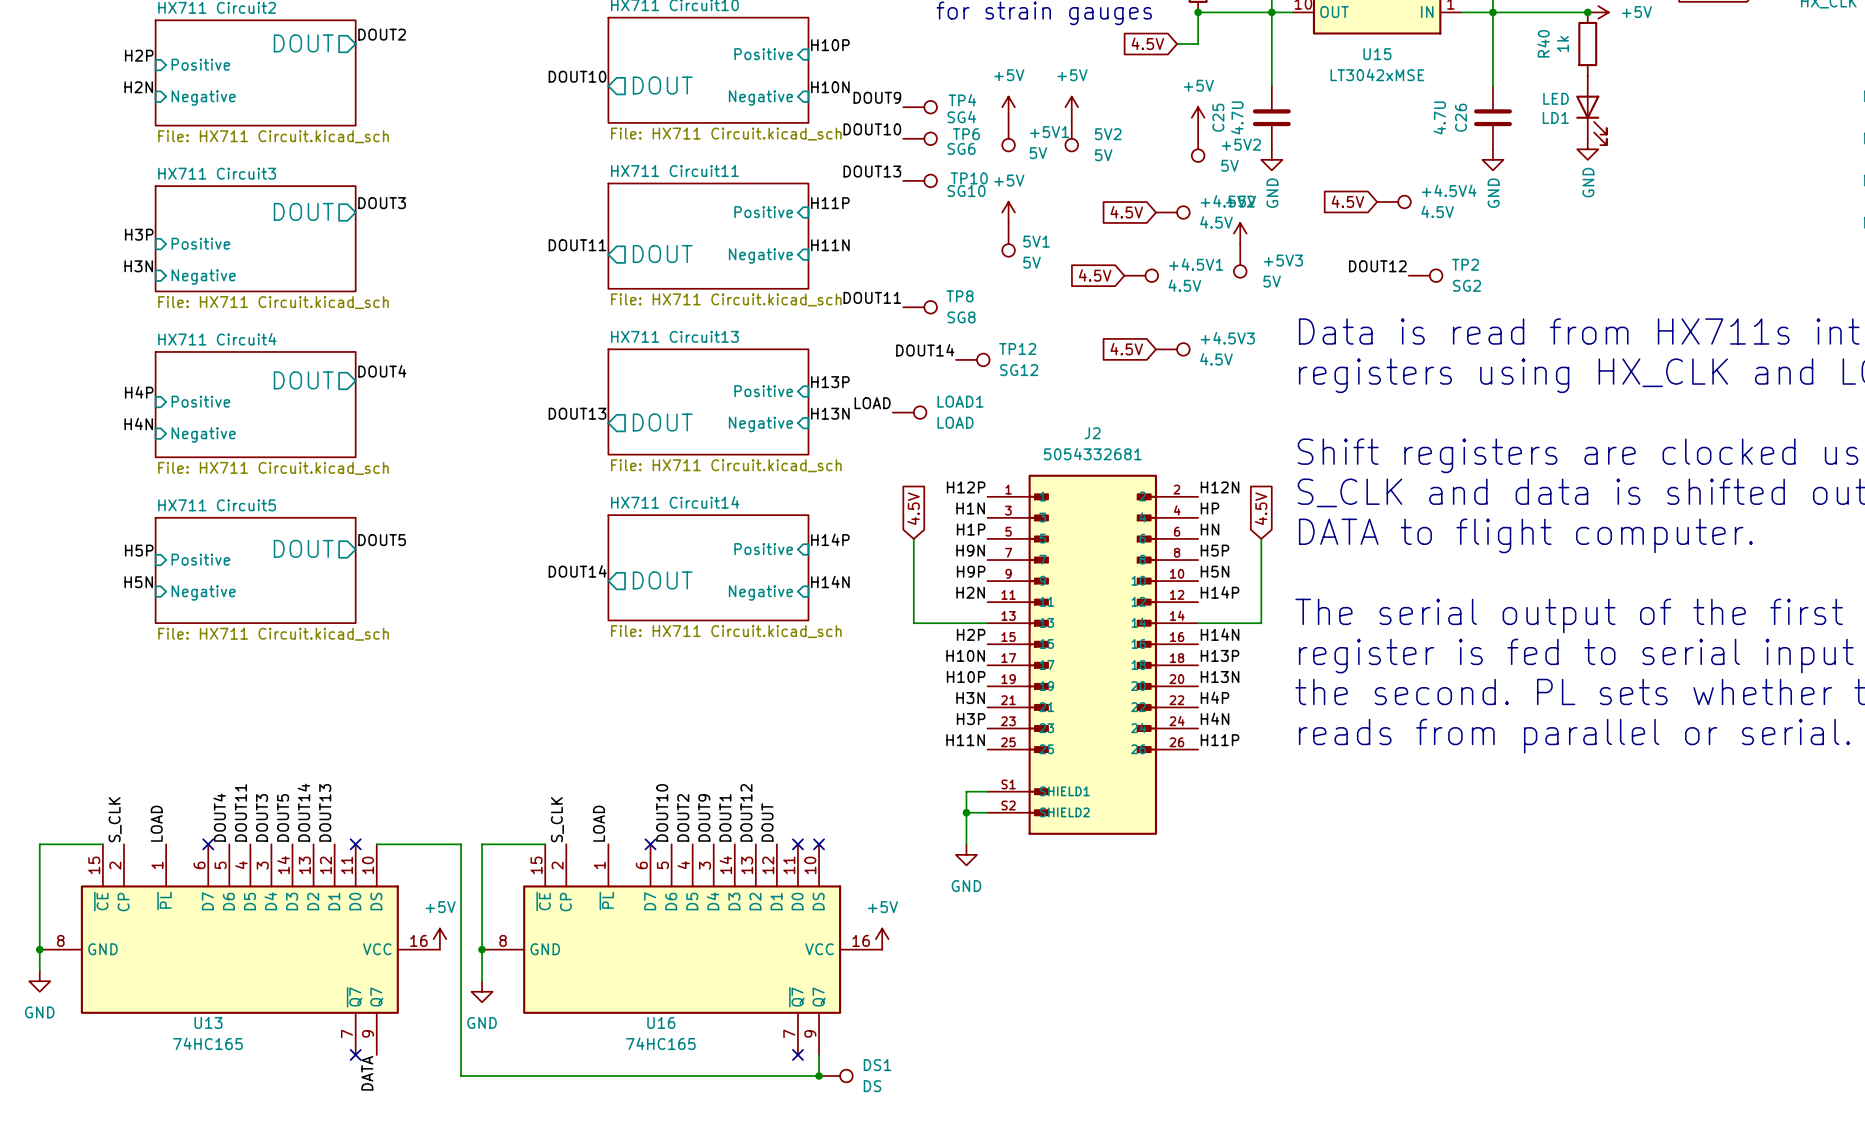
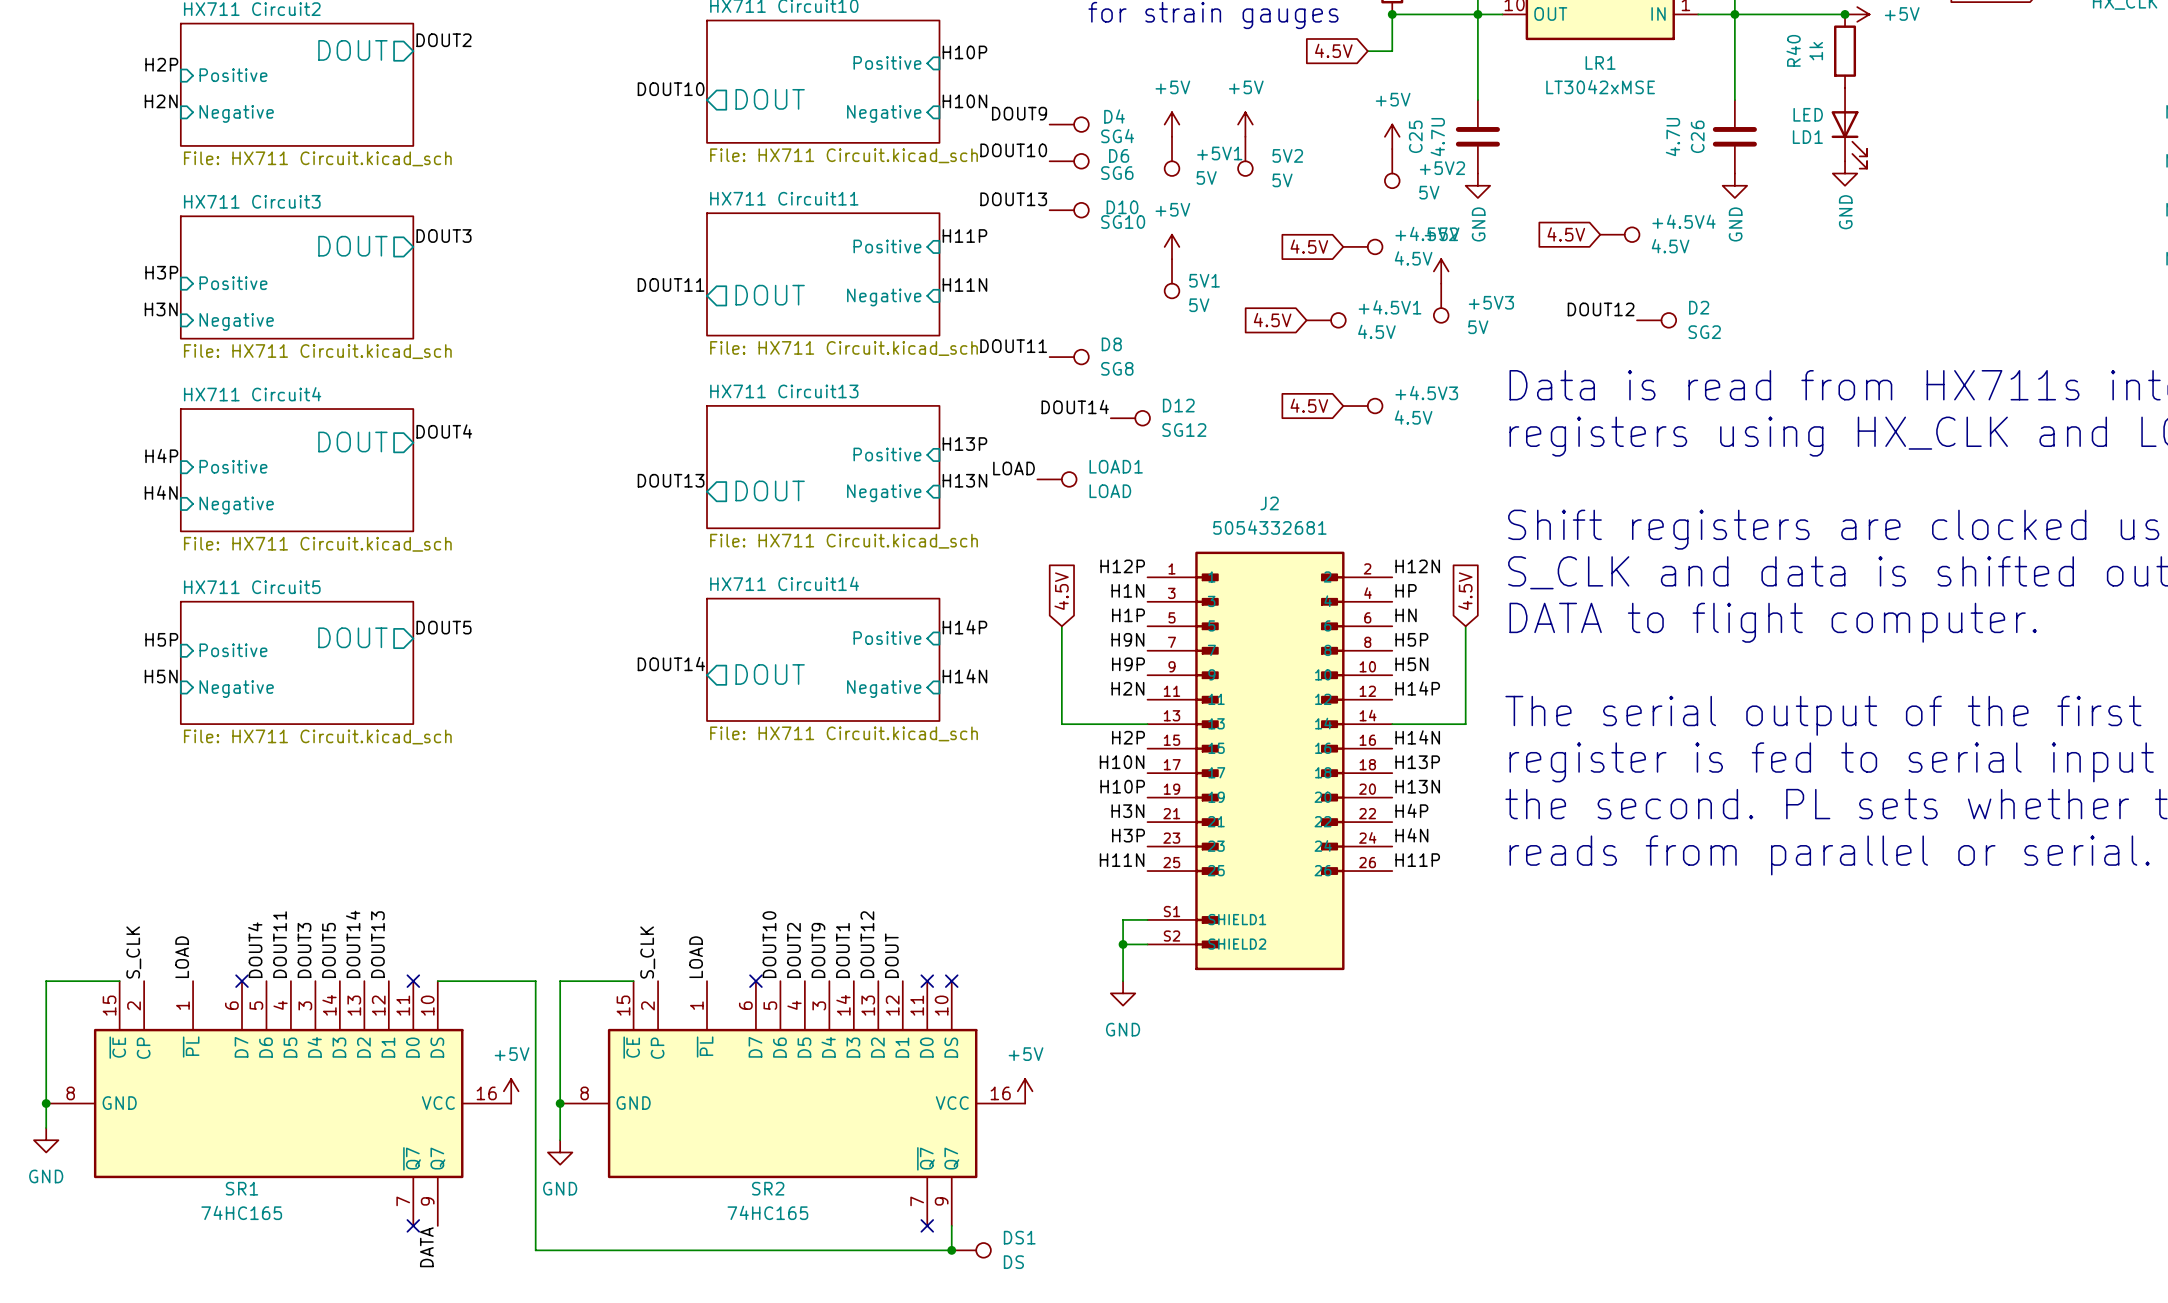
U15 name: U15 (1377, 54) -> LR1 (1600, 62)
TP4 name: TP4 (962, 100) -> D4 (1114, 116)
TP6 name: TP6 (966, 134) -> D6 (1119, 155)
TP10 name: TP10 (969, 178) -> D10 (1122, 207)
TP2 name: TP2 (1465, 264) -> D2 (1699, 307)
TP8 name: TP8 (960, 296) -> D8 (1111, 344)
TP12 name: TP12 (1017, 349) -> D12 (1178, 405)
U13 name: U13 (208, 1022) -> SR1 (242, 1188)
U16 name: U16 (661, 1022) -> SR2 (768, 1188)

